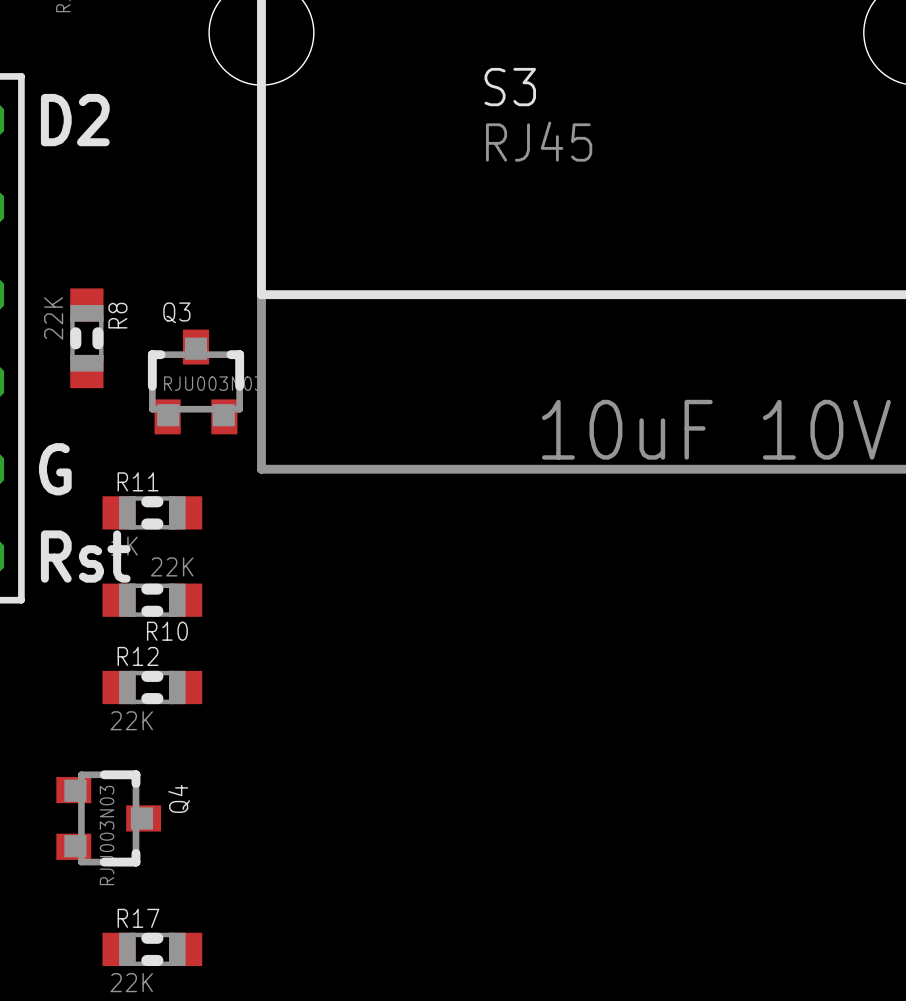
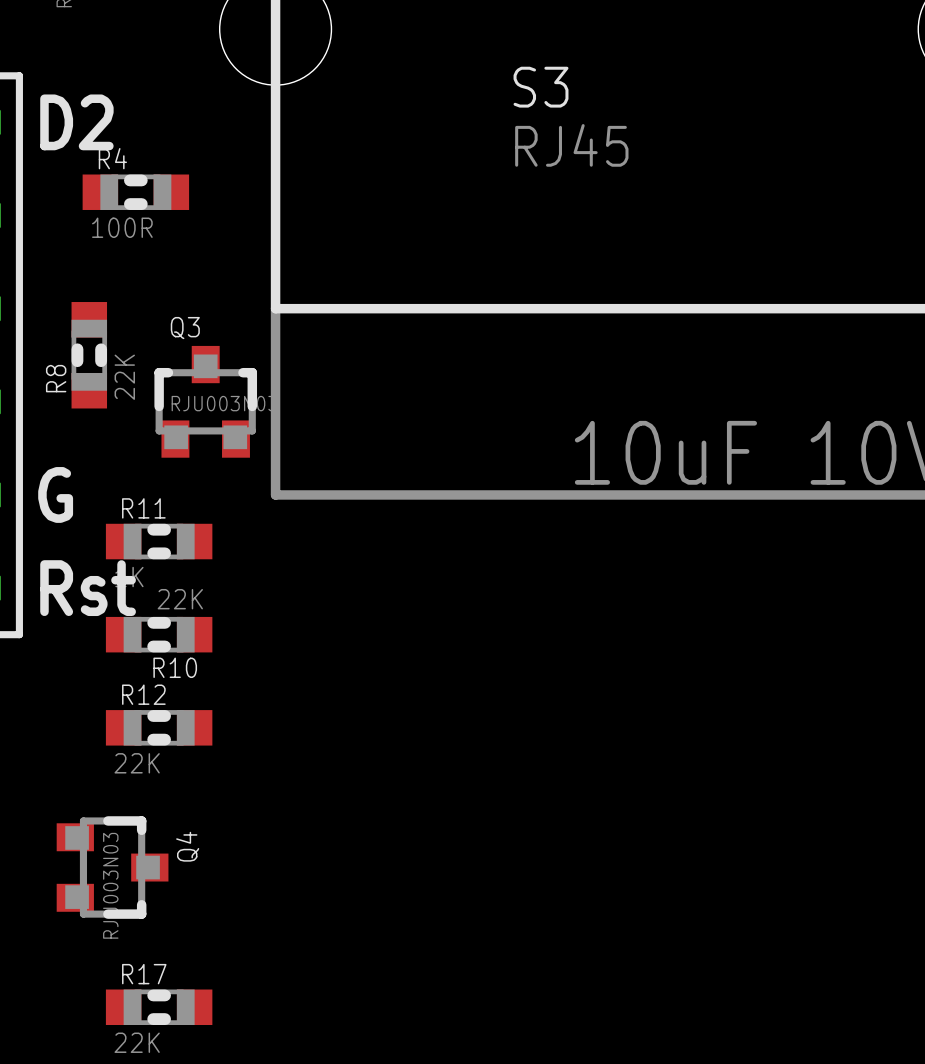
R4: none -> 100R (135, 192)
R8 name position: R8 (117, 315) -> R8 (56, 378)
R8 value position: 22K (53, 318) -> 22K (124, 377)

